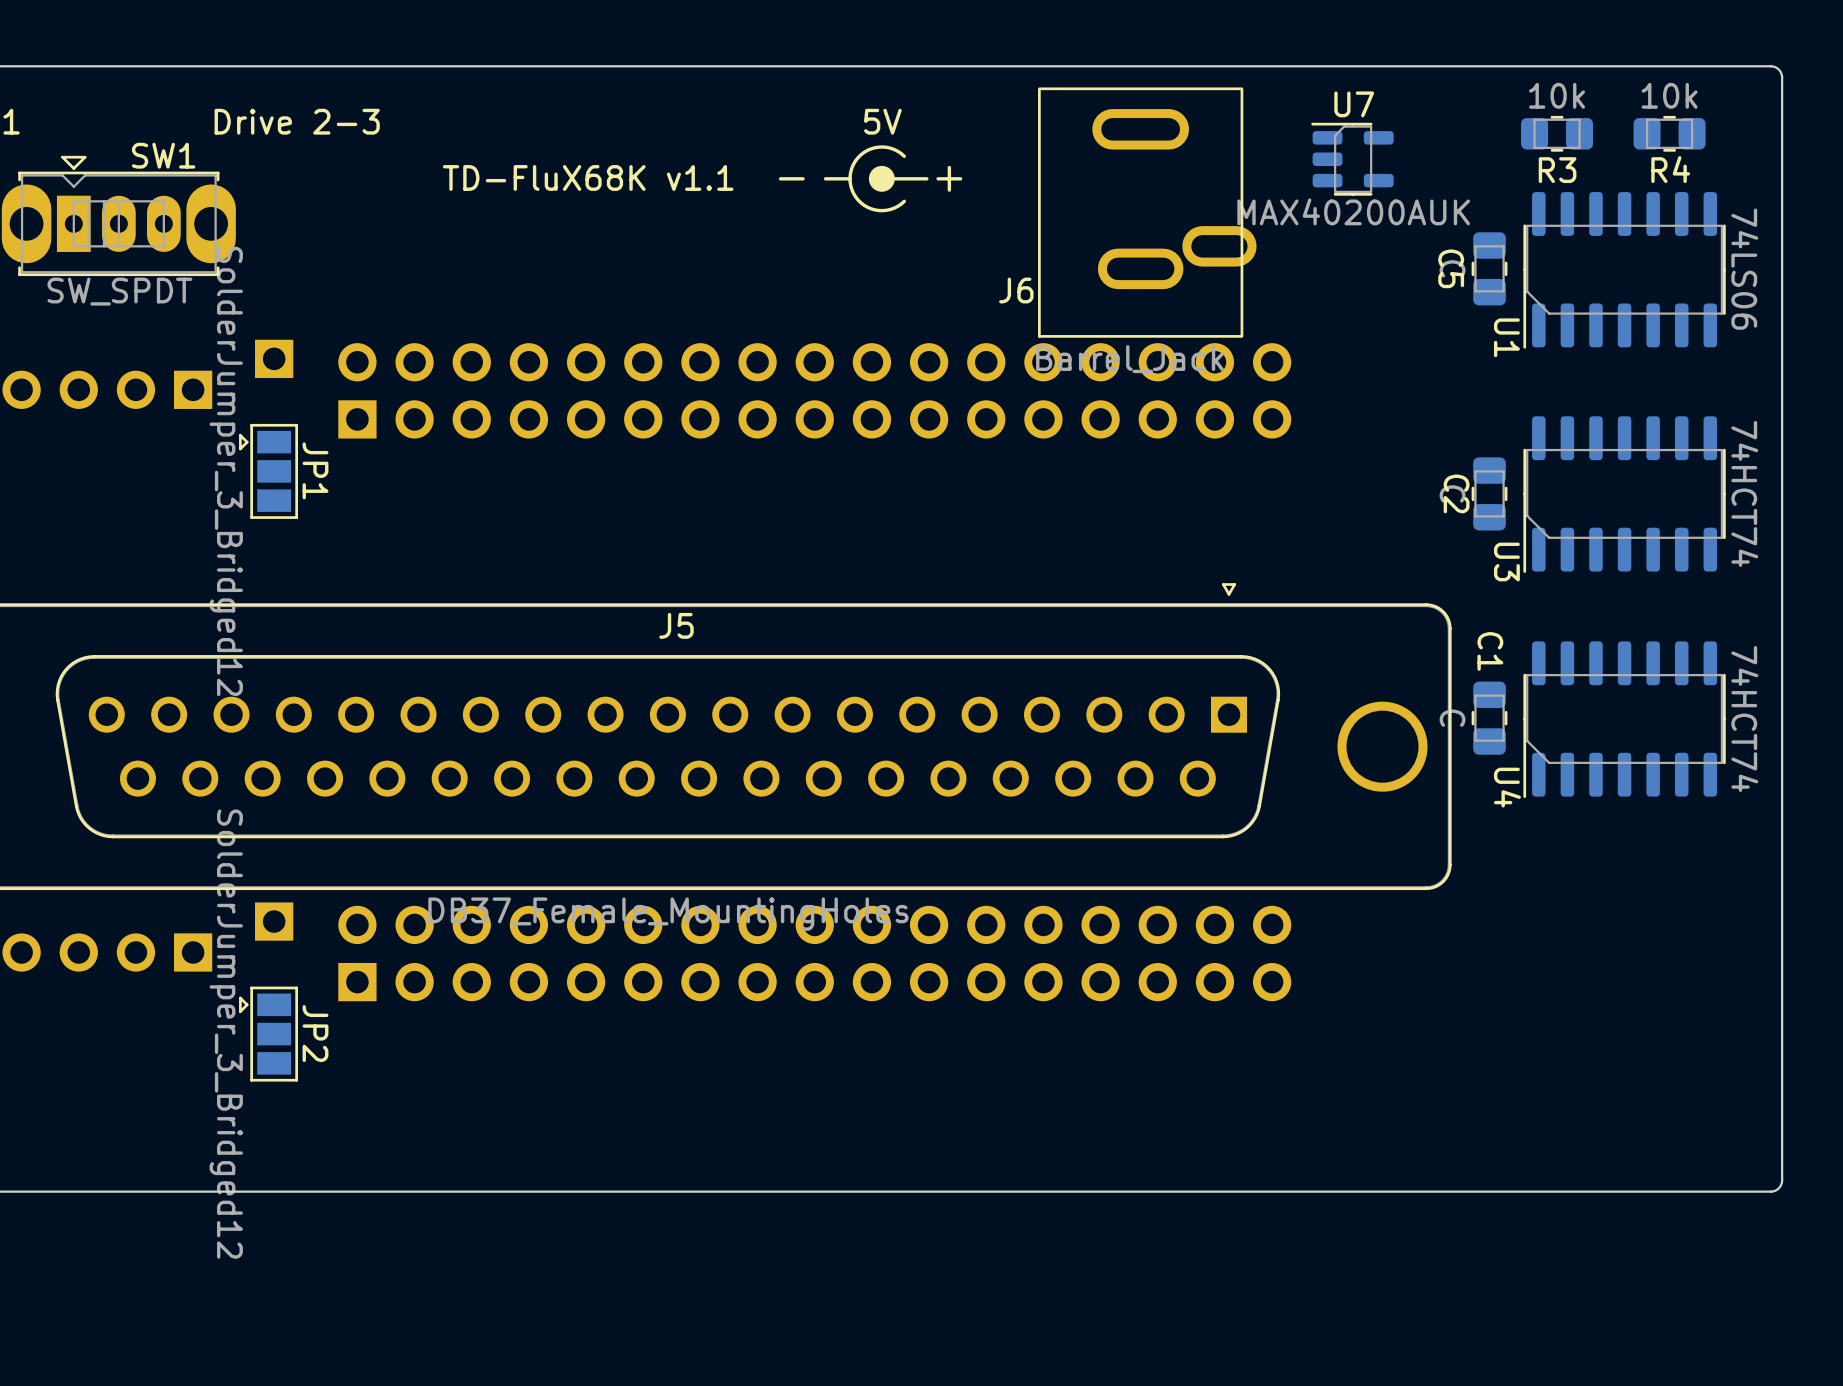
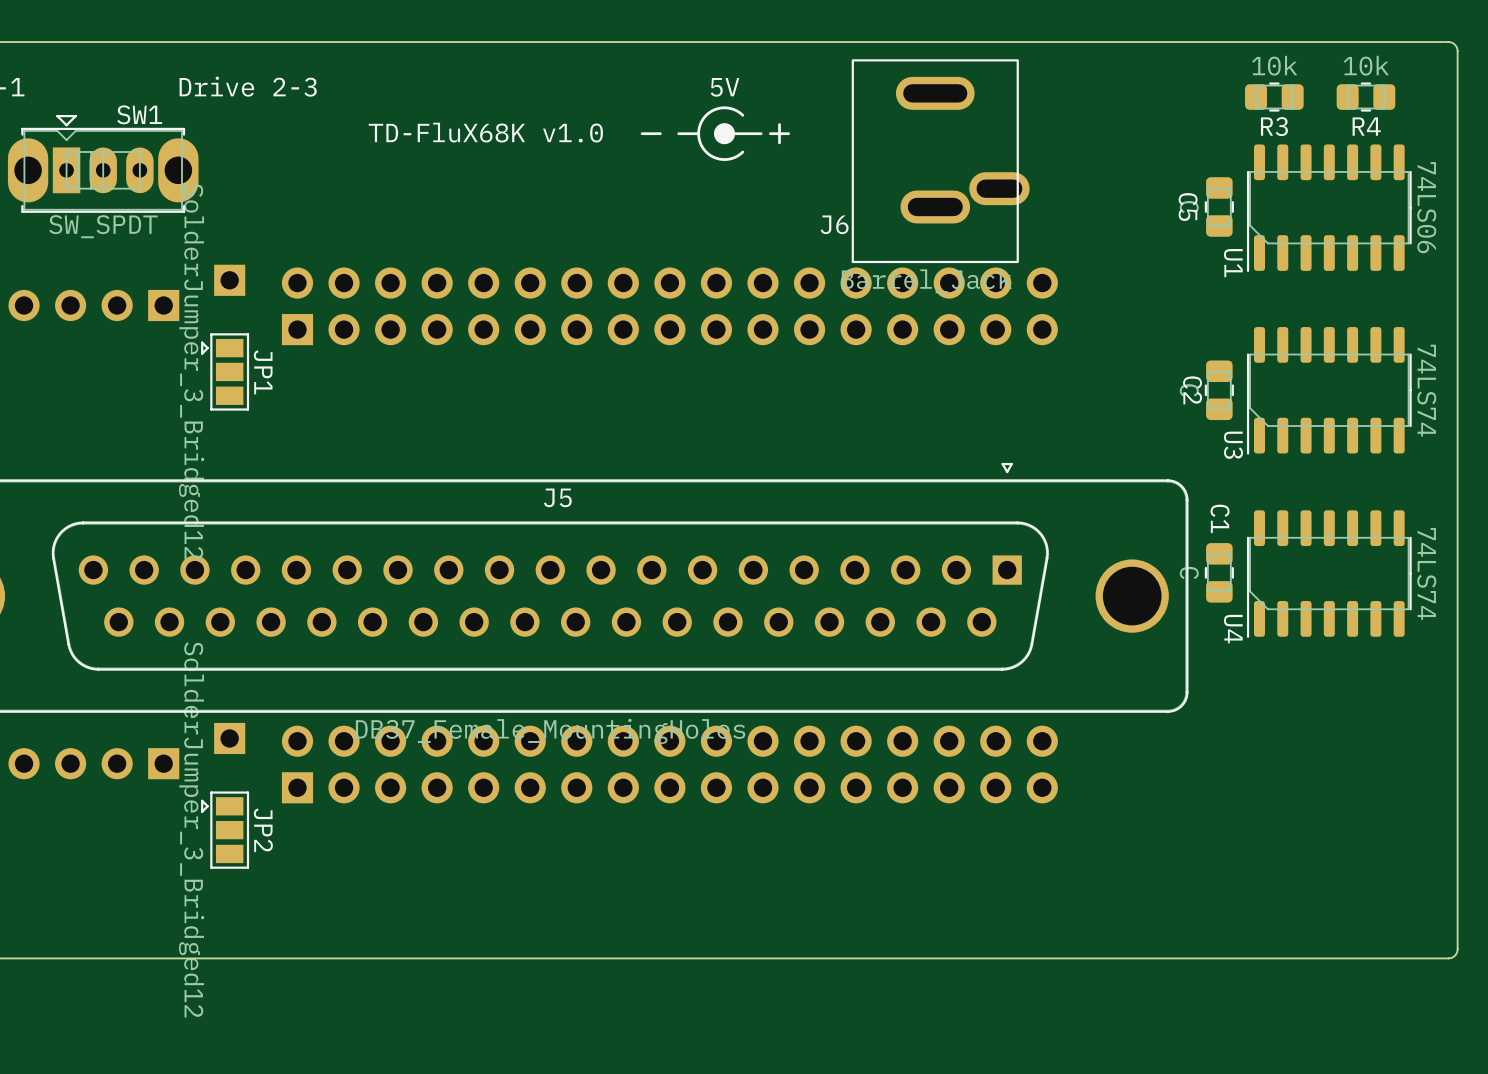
U7: MAX40200AUK (1352, 159) -> none
text: TD-FluX68K v1.1 (588, 177) -> TD-FluX68K v1.0 (485, 132)
U3 value: 74HCT74 (1744, 493) -> 74LS74 (1426, 390)
U4 value: 74HCT74 (1744, 718) -> 74LS74 (1426, 573)

